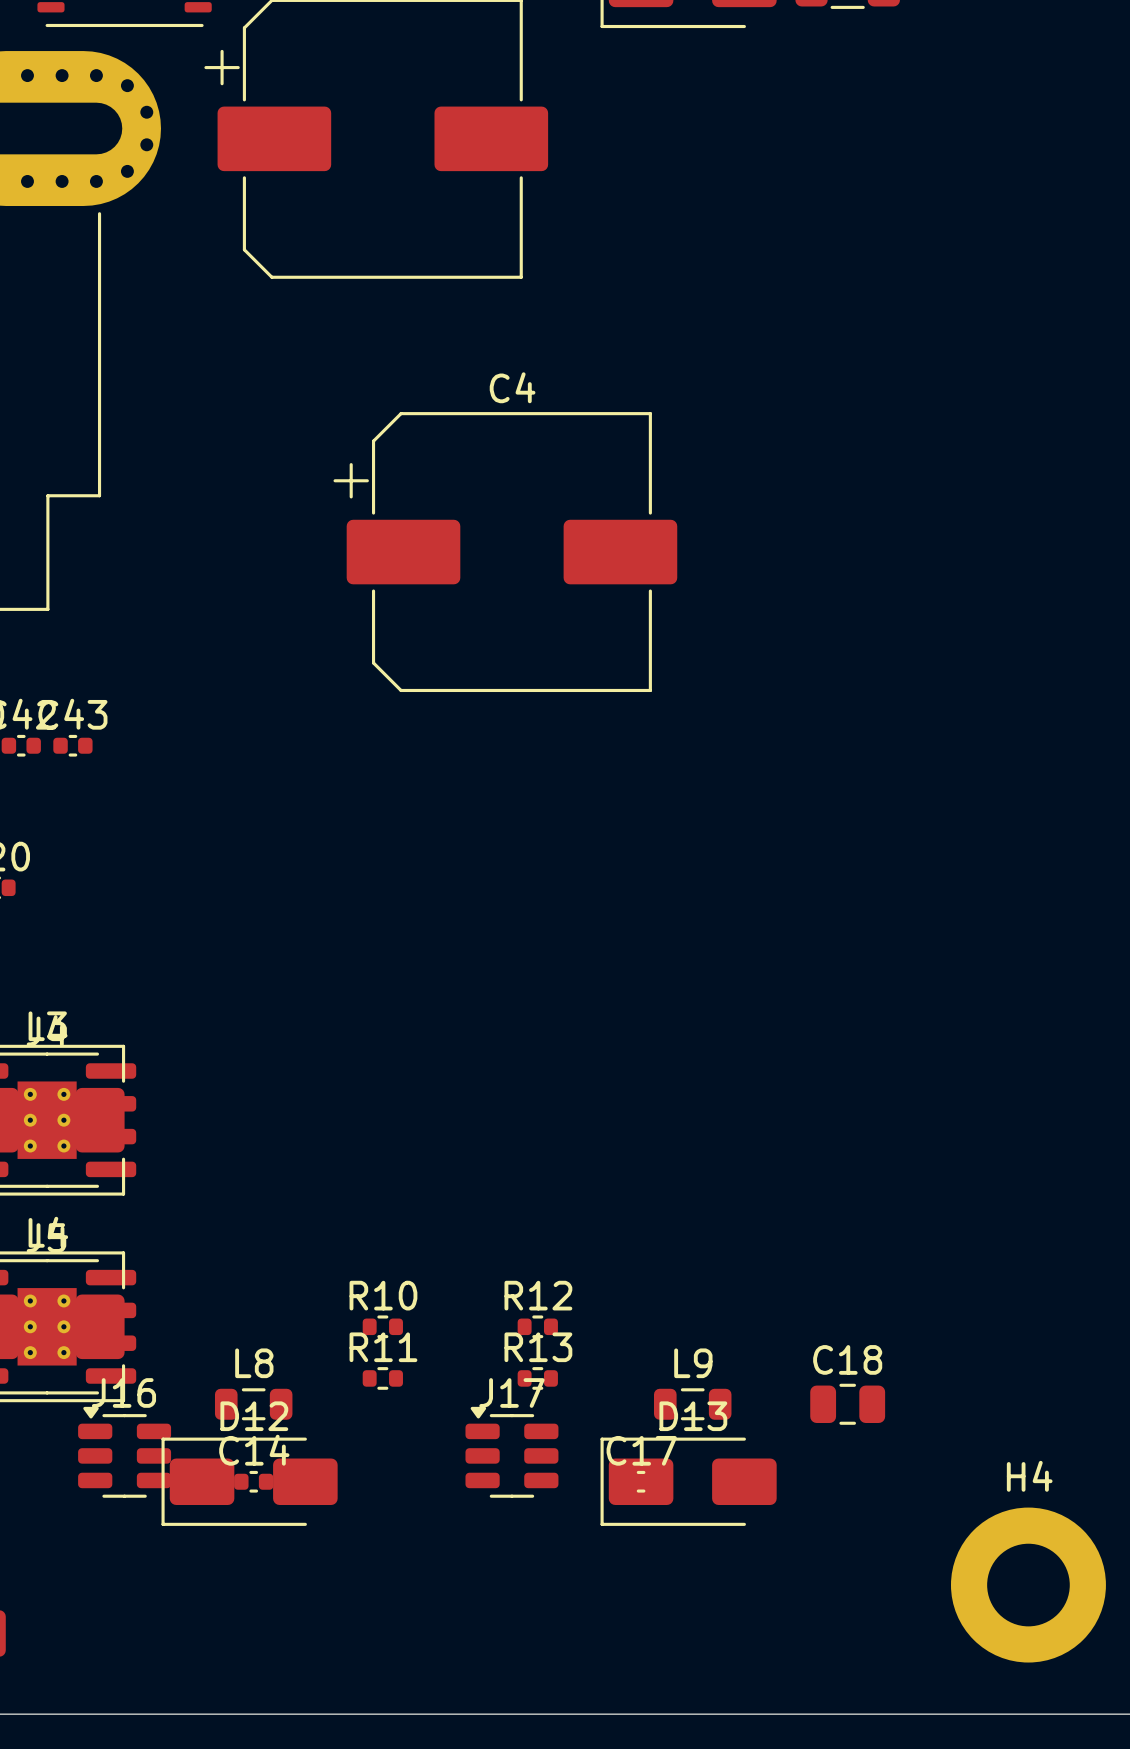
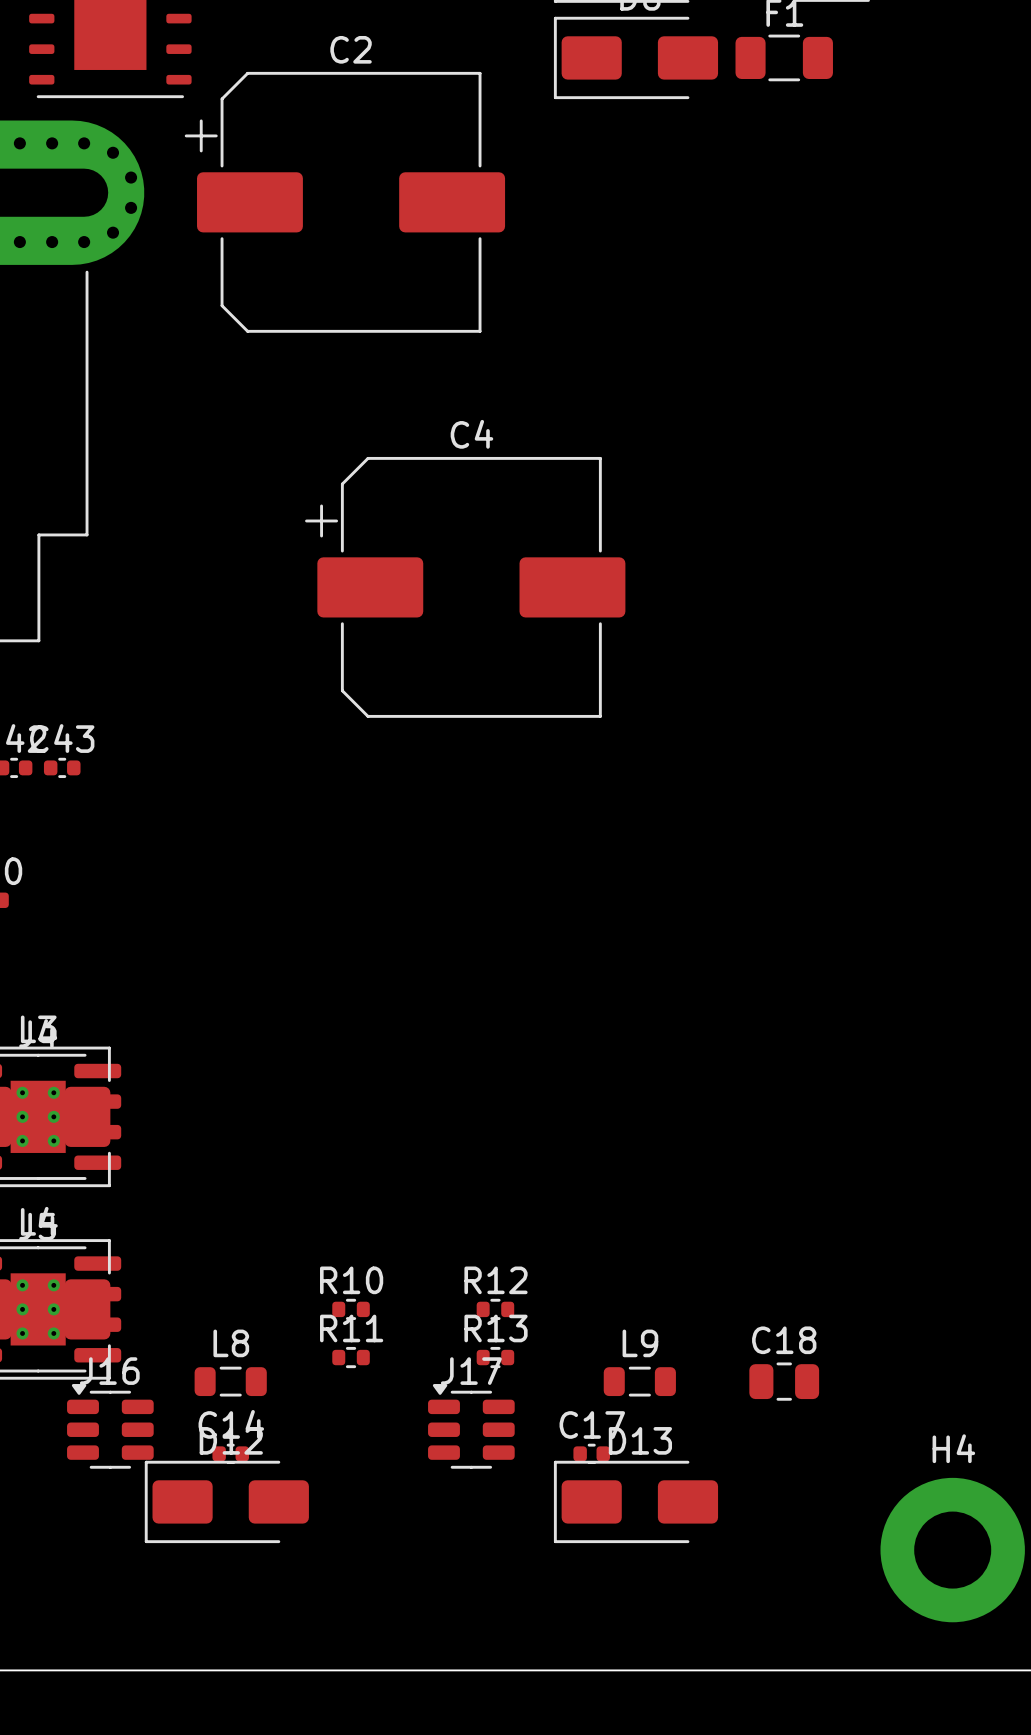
D12 position: (249, 1481) -> (226, 1501)
D13 position: (688, 1481) -> (635, 1501)

